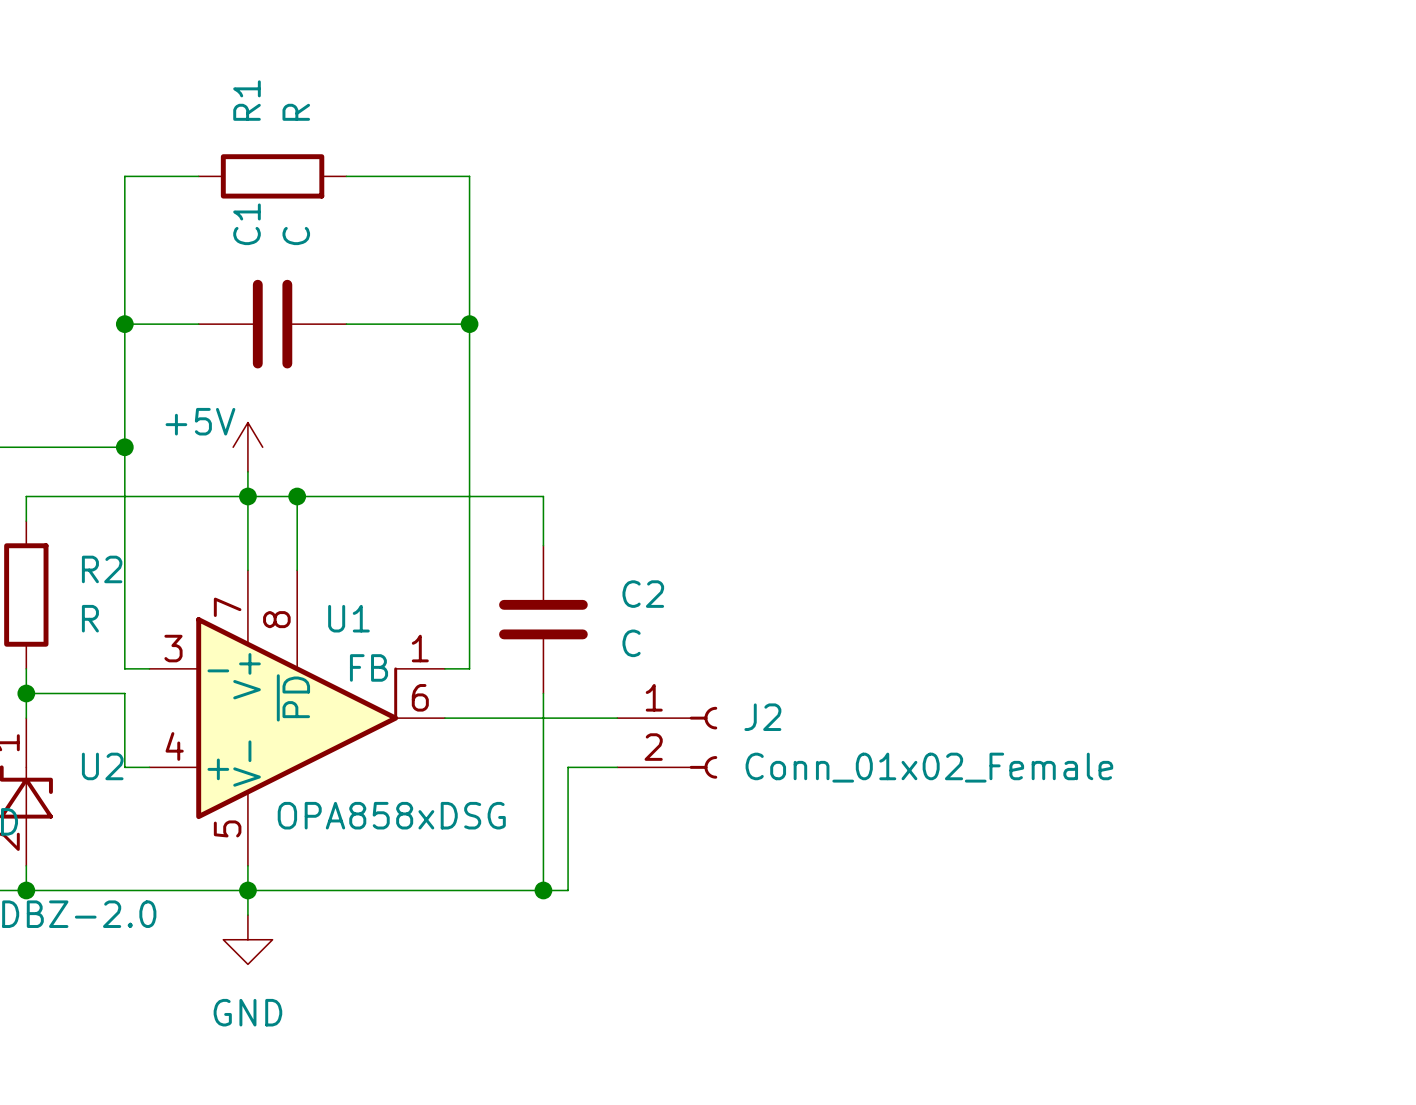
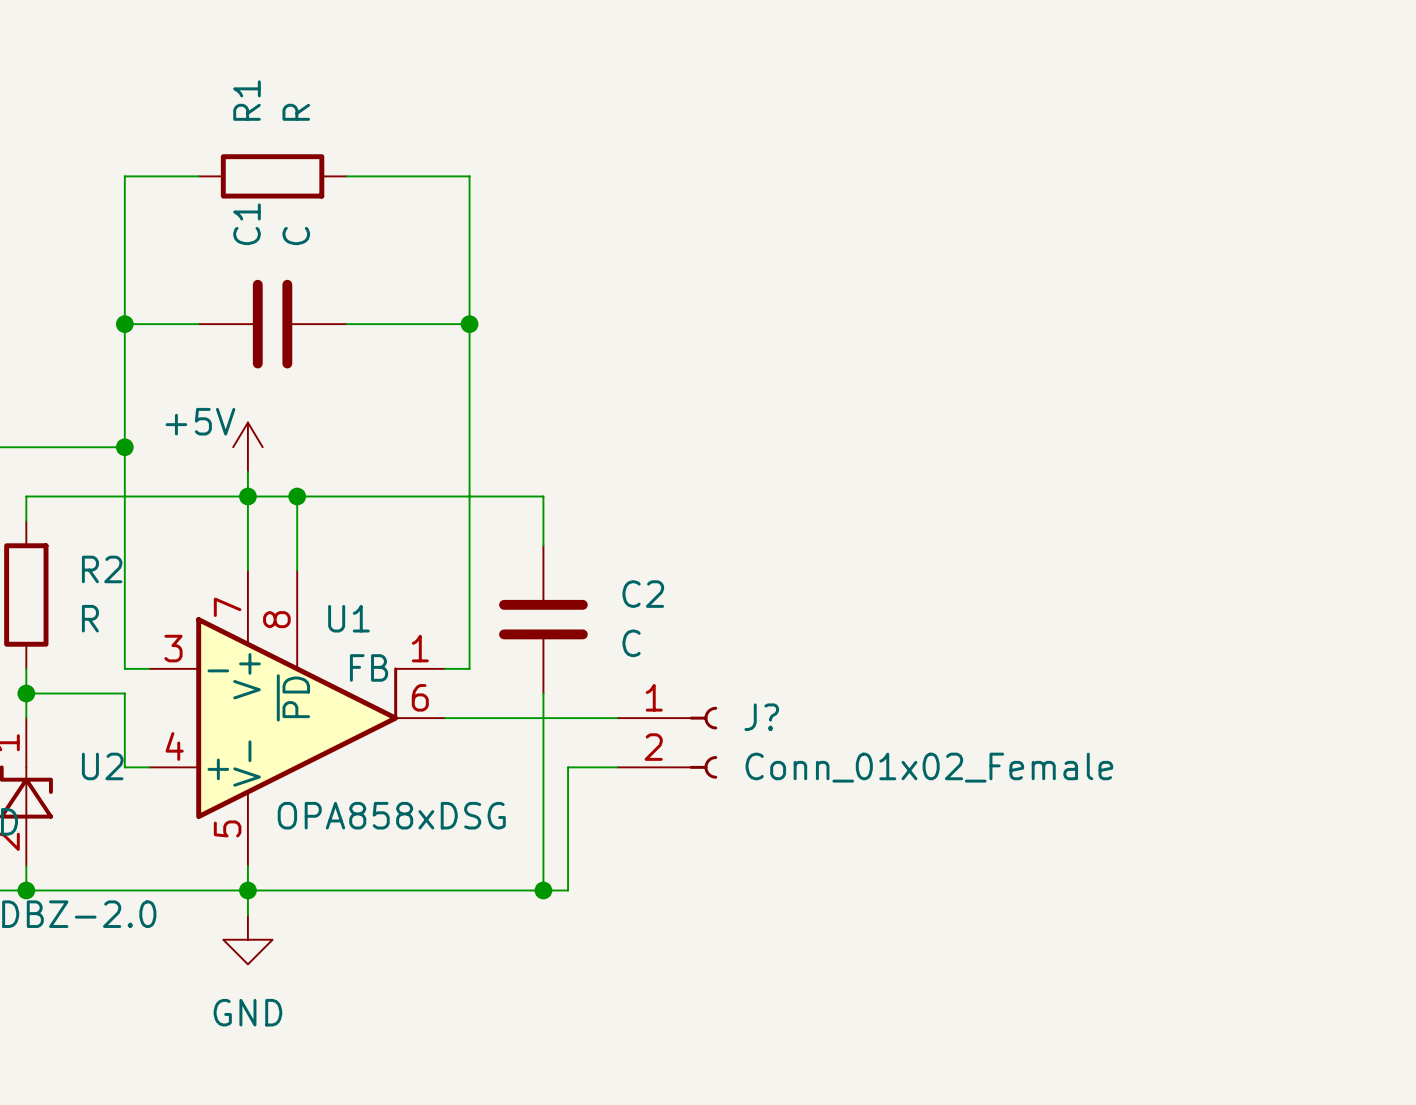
J2 name: J2 (762, 717) -> J? (761, 717)

